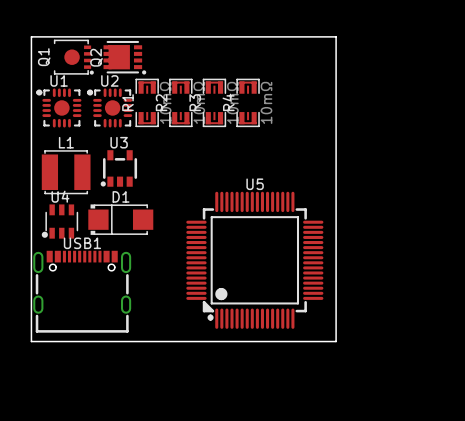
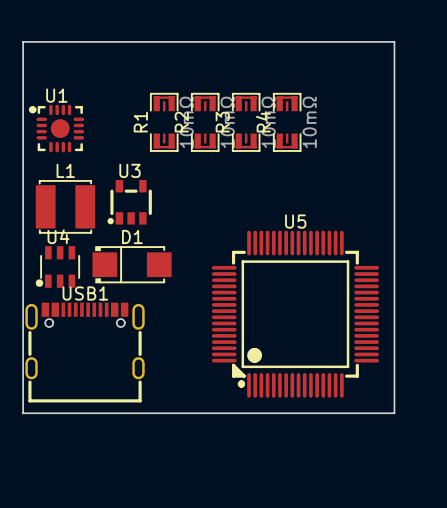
Q1: (73, 57) -> none
Q2: (124, 57) -> none
U2: (109, 107) -> none

